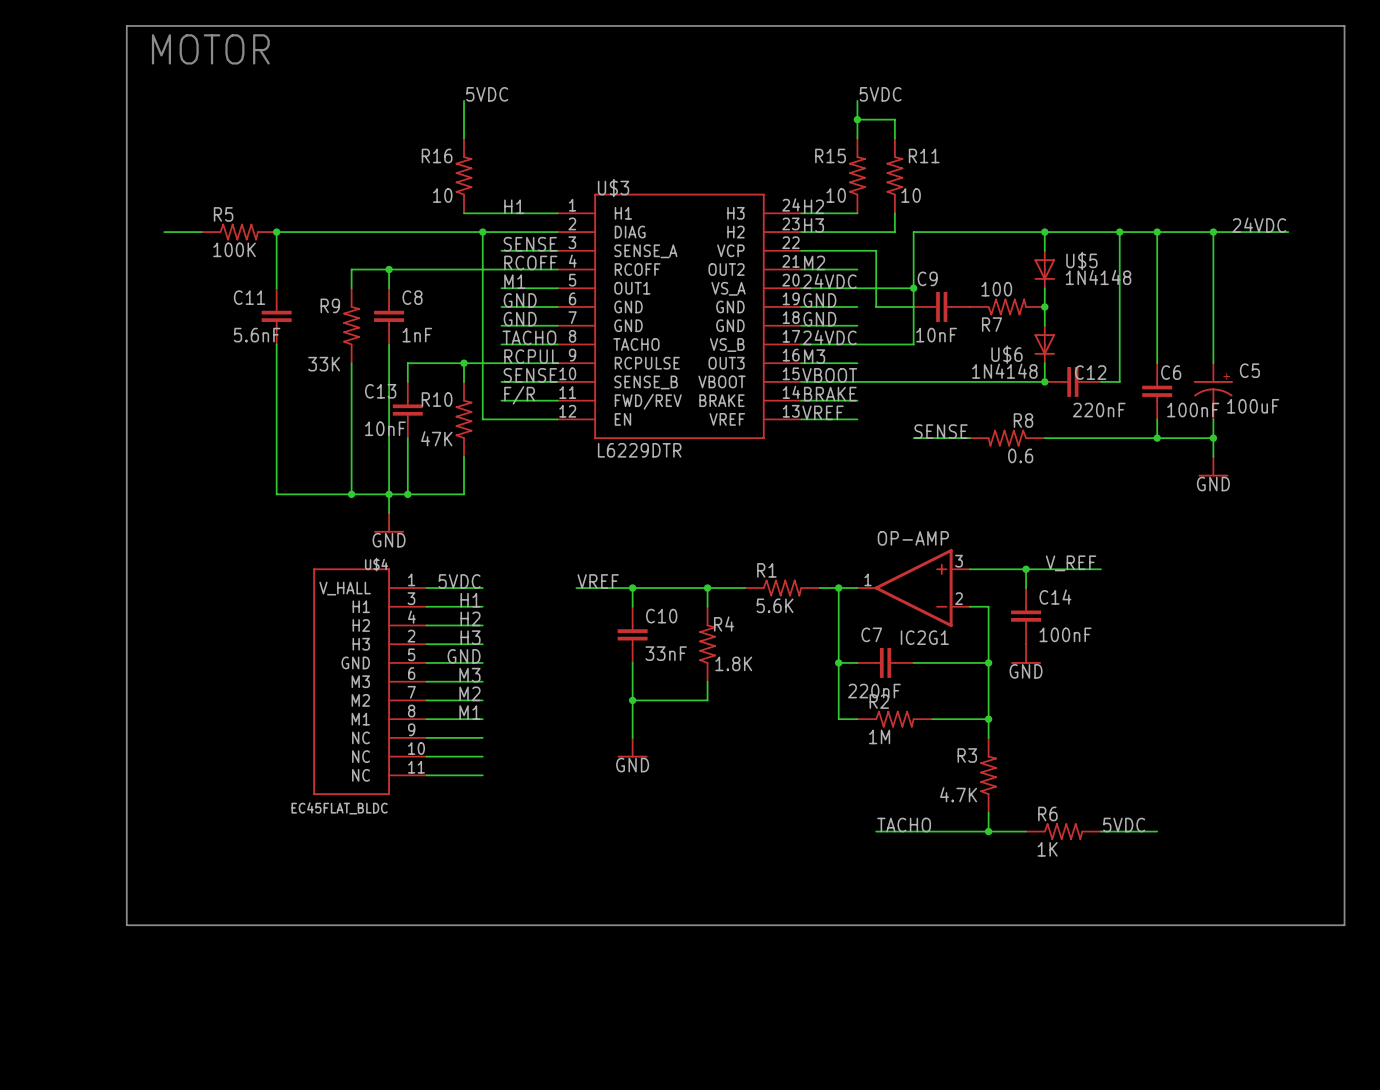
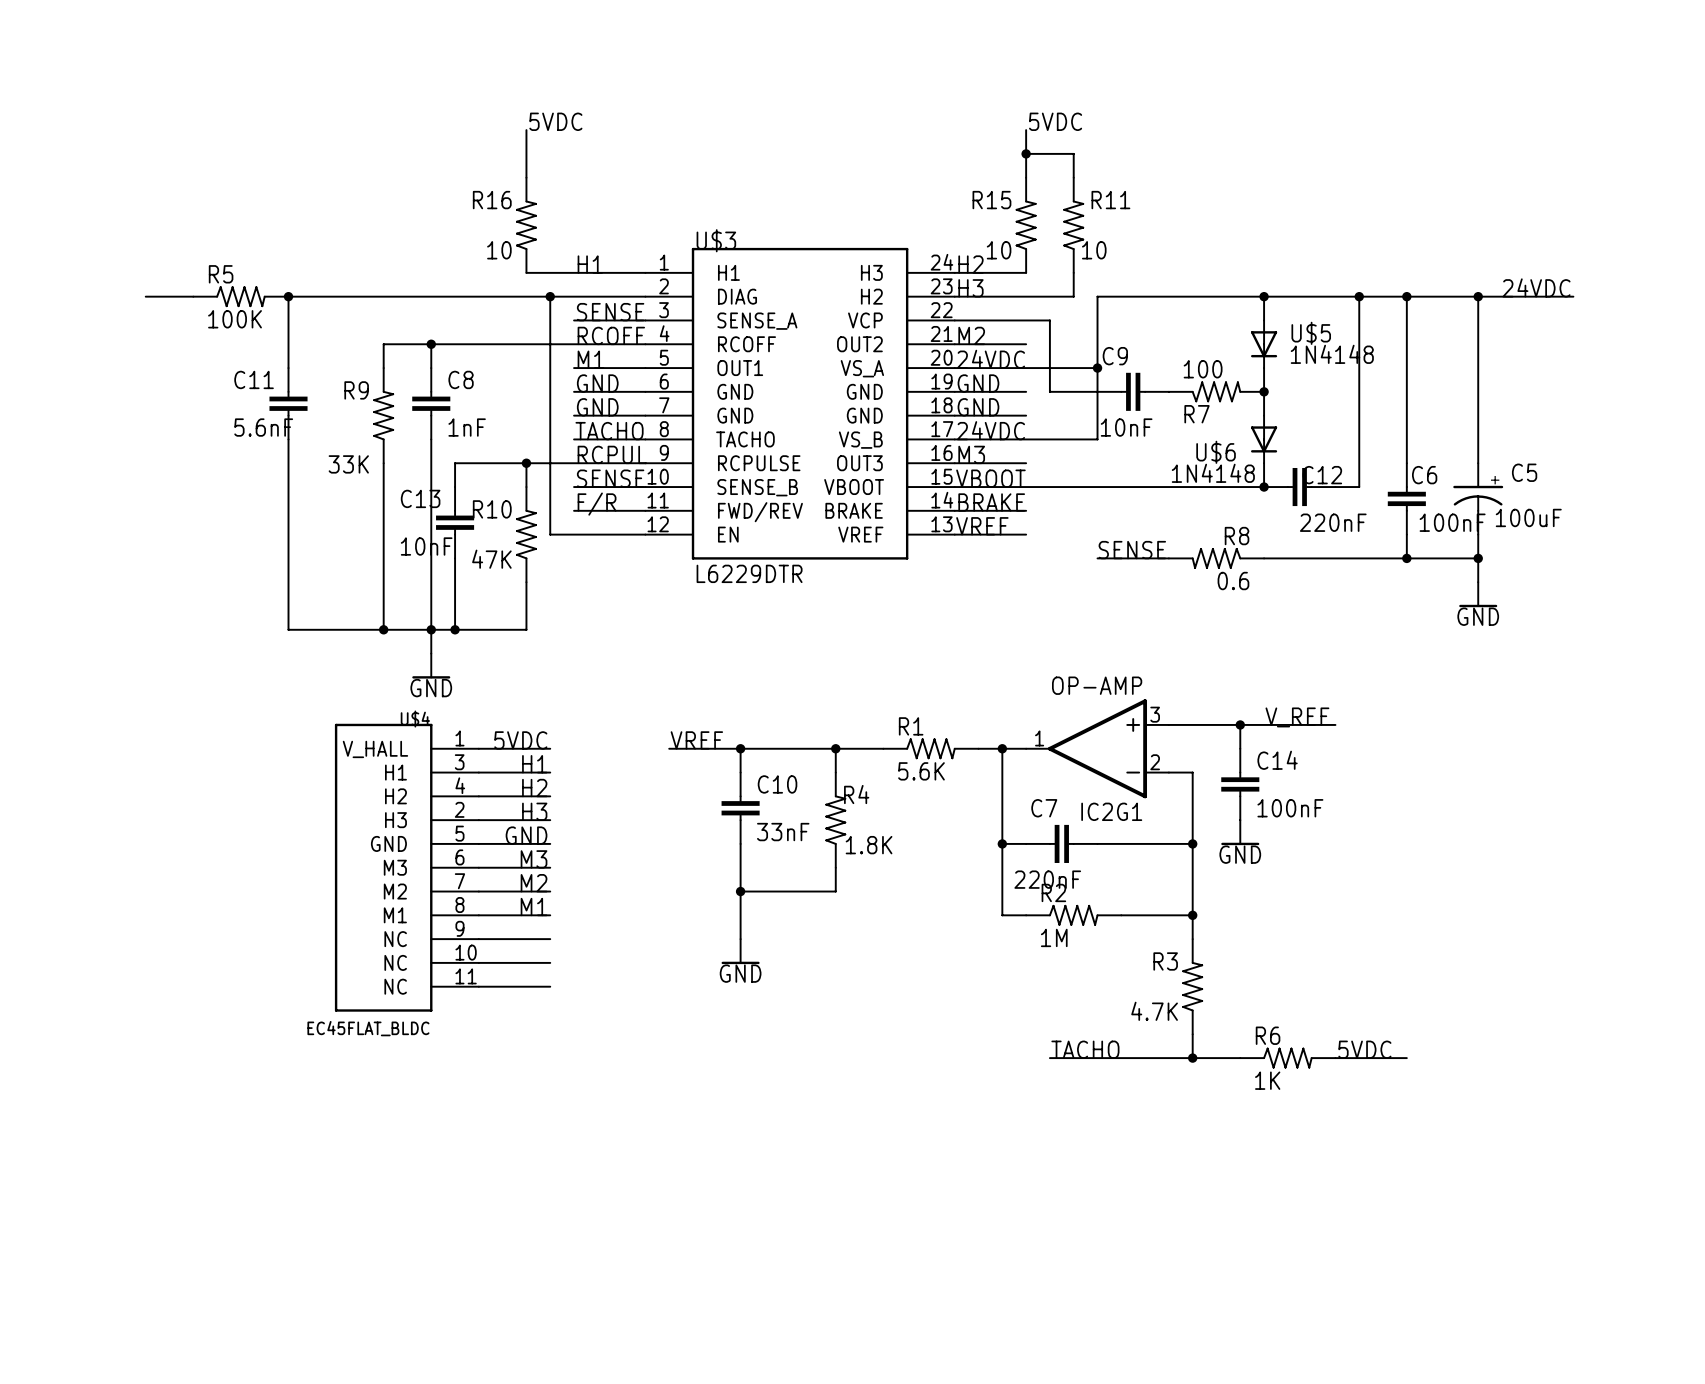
line: (126, 25) (1344, 25) (1344, 925) (126, 925) (126, 25) -> none
text: MOTOR (210, 49) -> none

